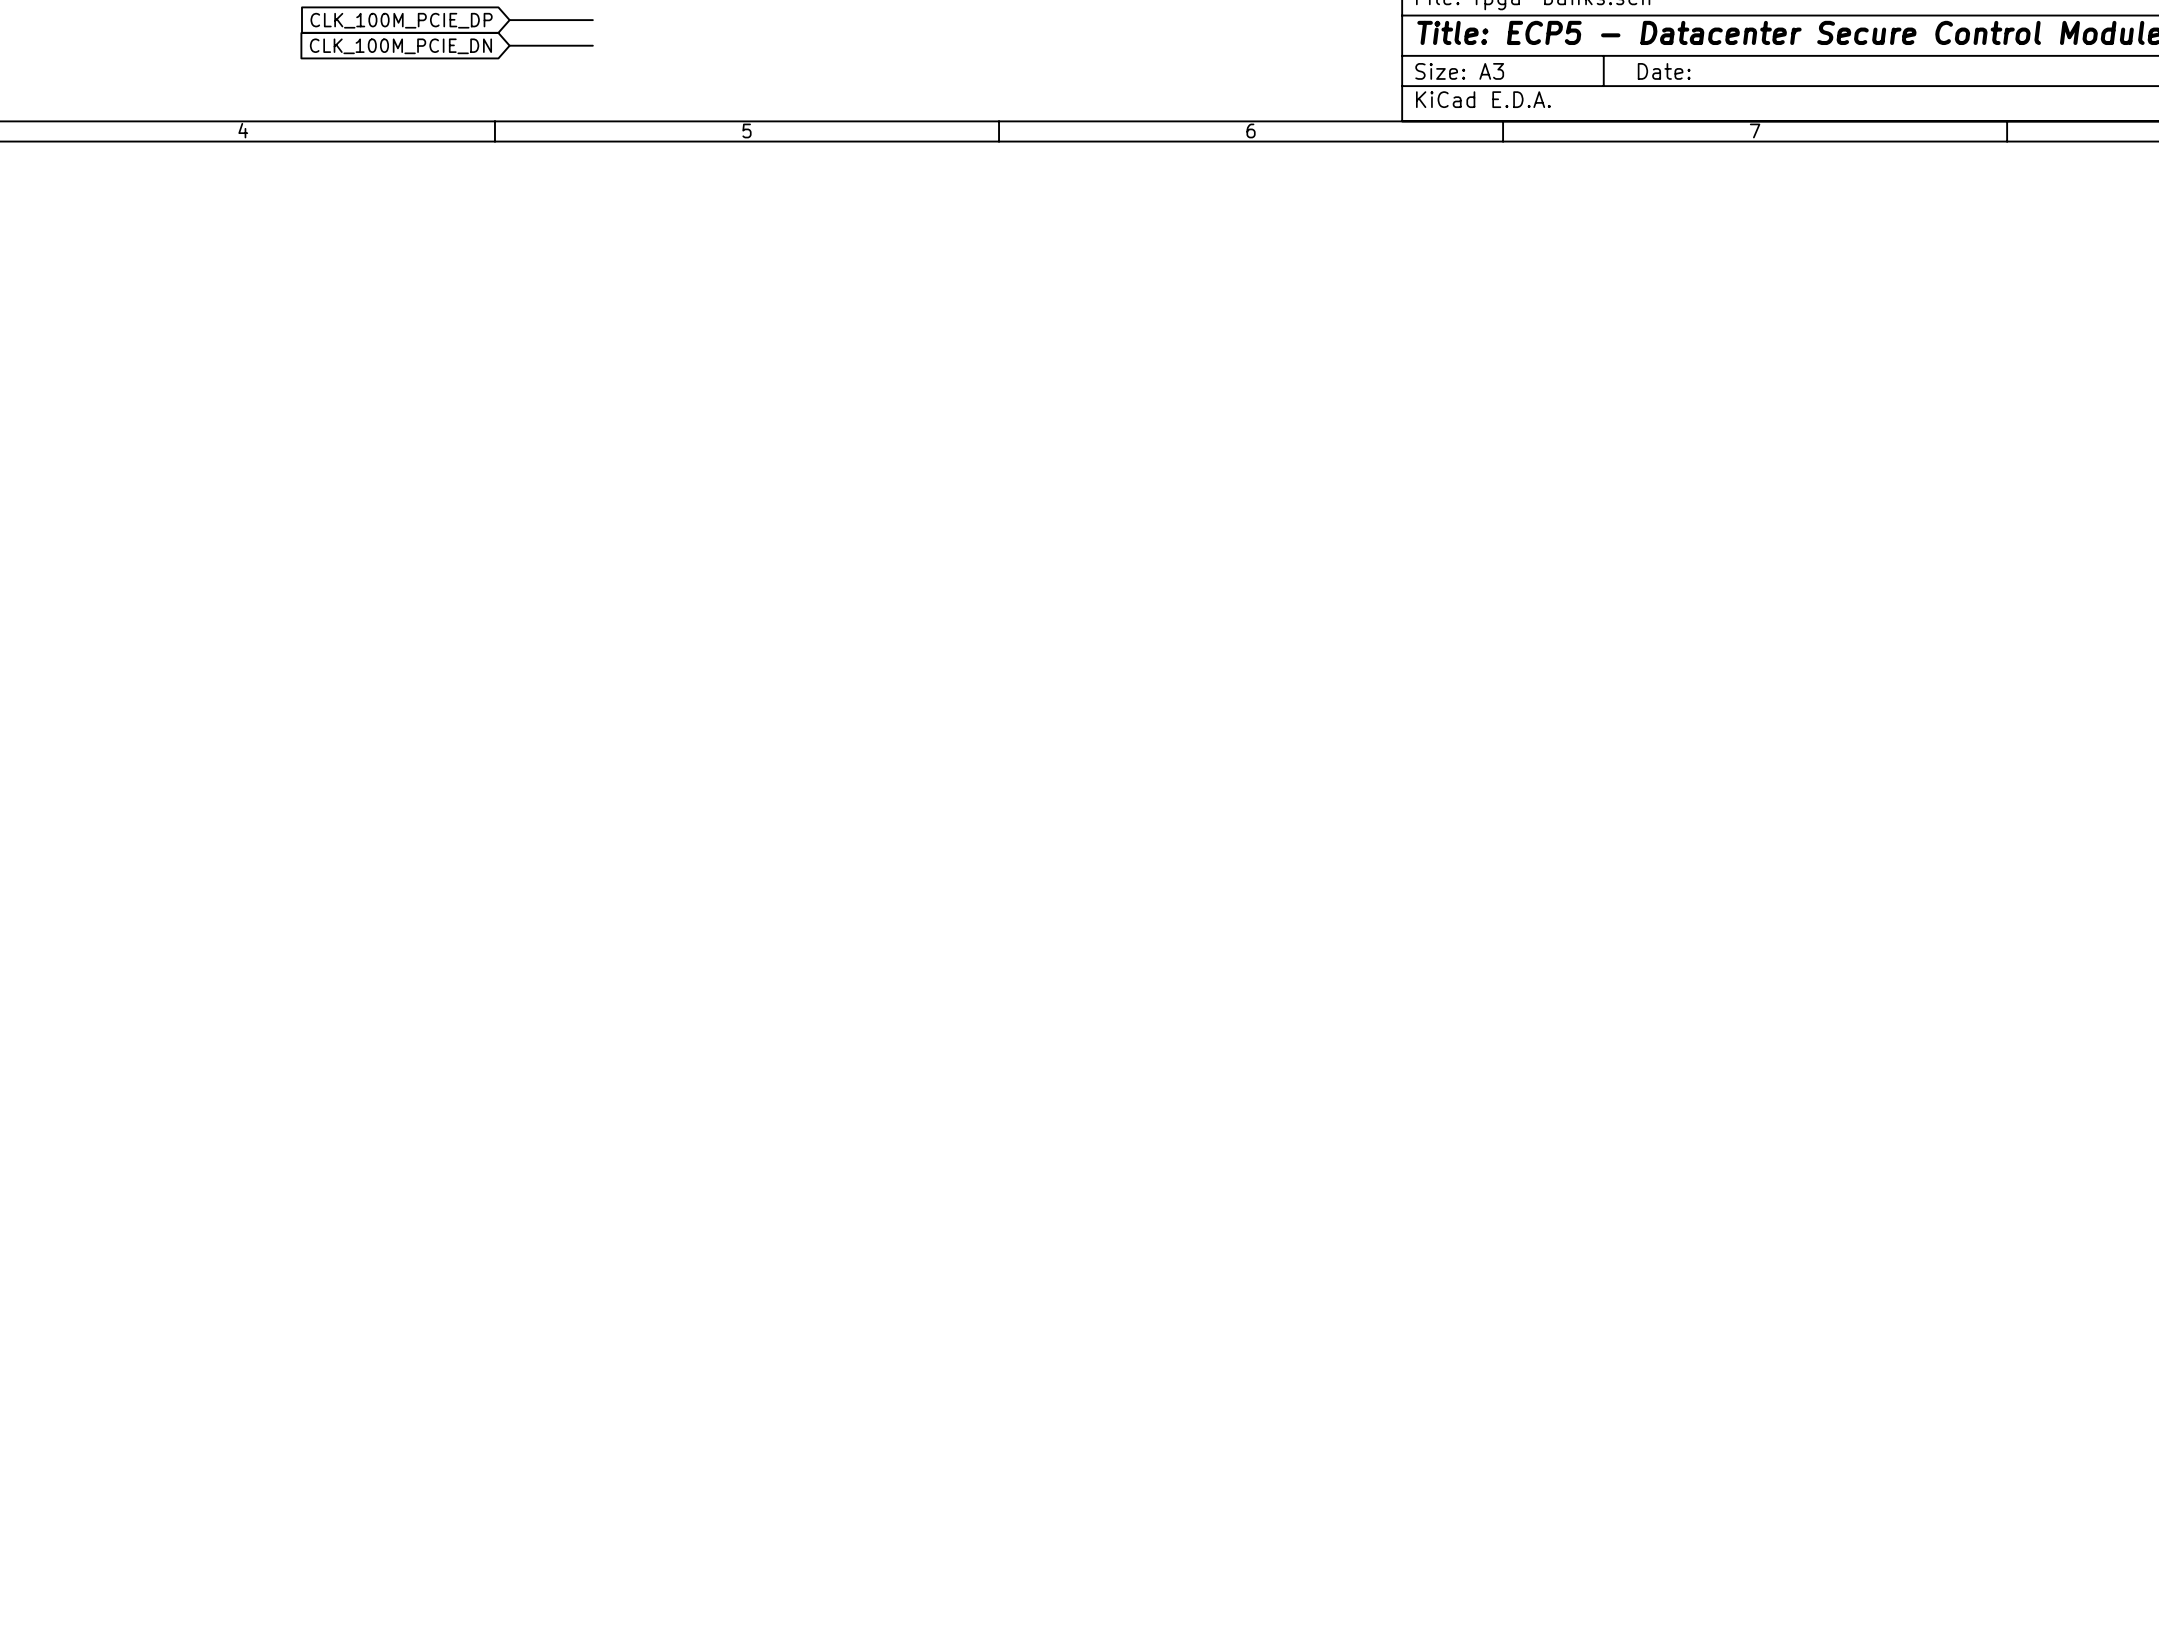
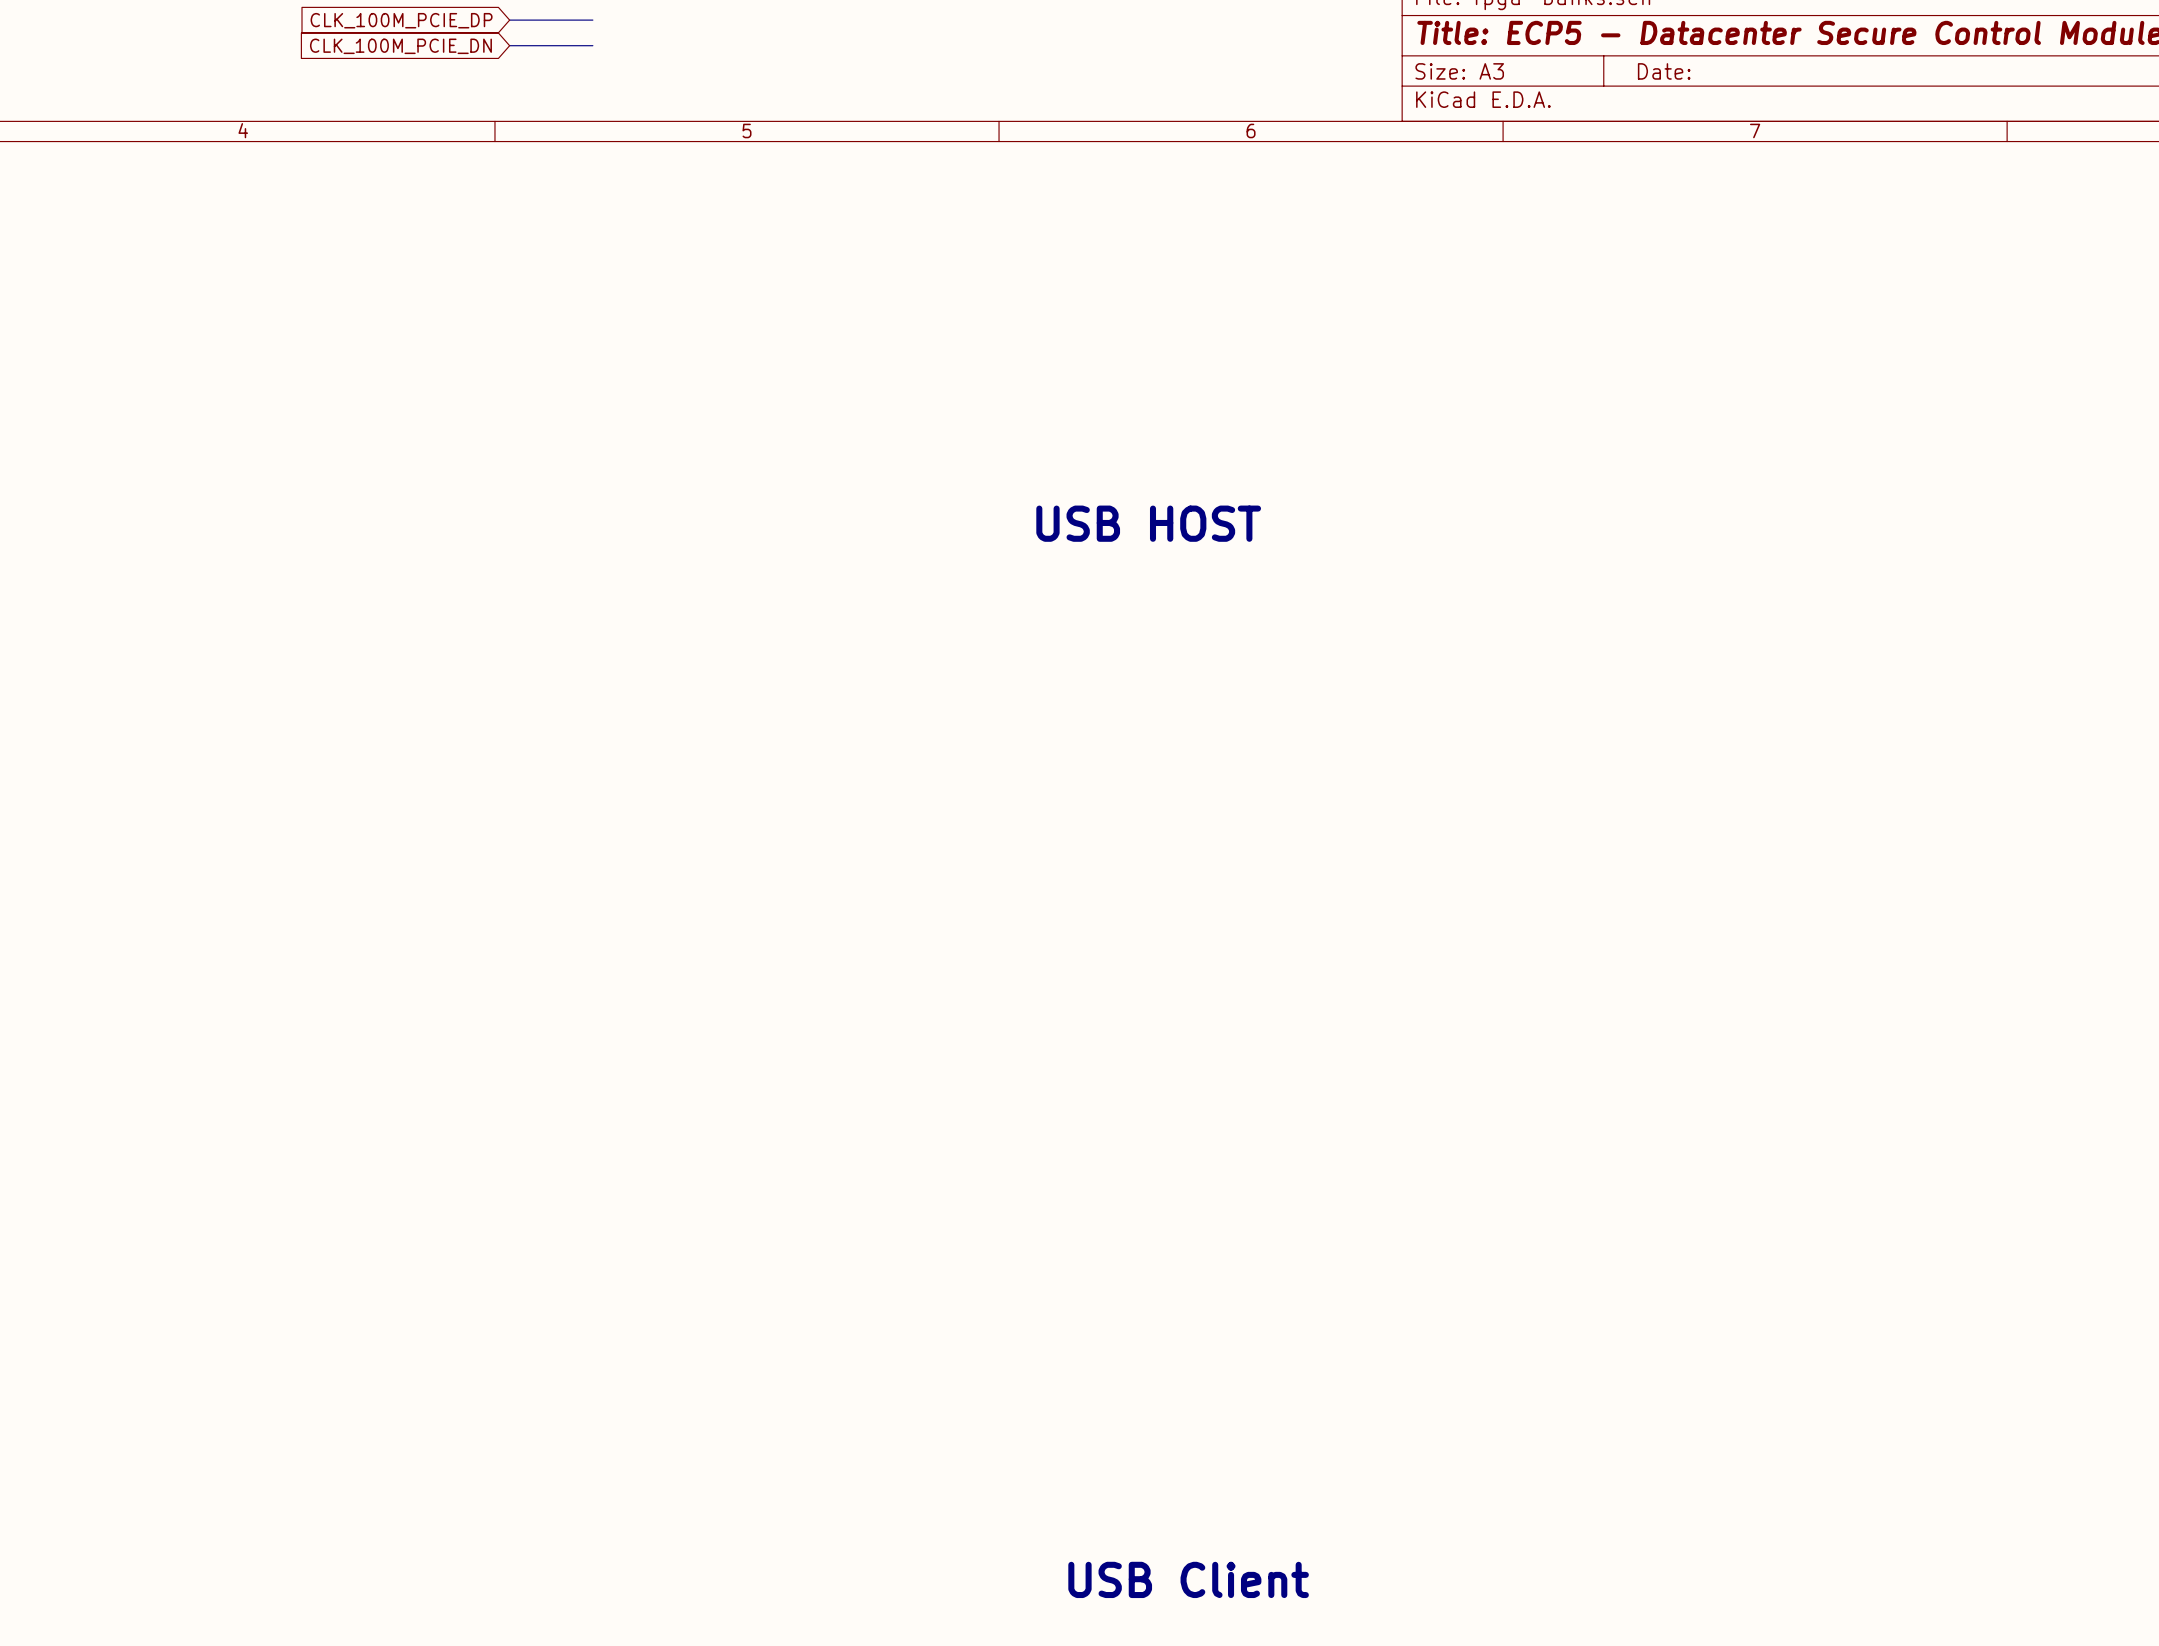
text: none -> USB HOST (1148, 523)
text: none -> USB Client (1188, 1579)

